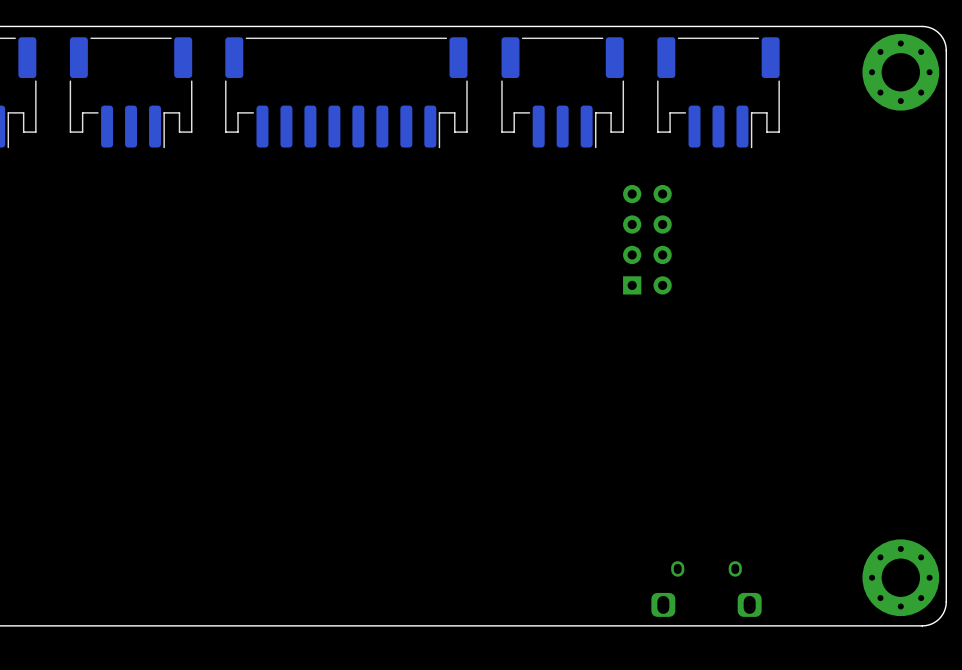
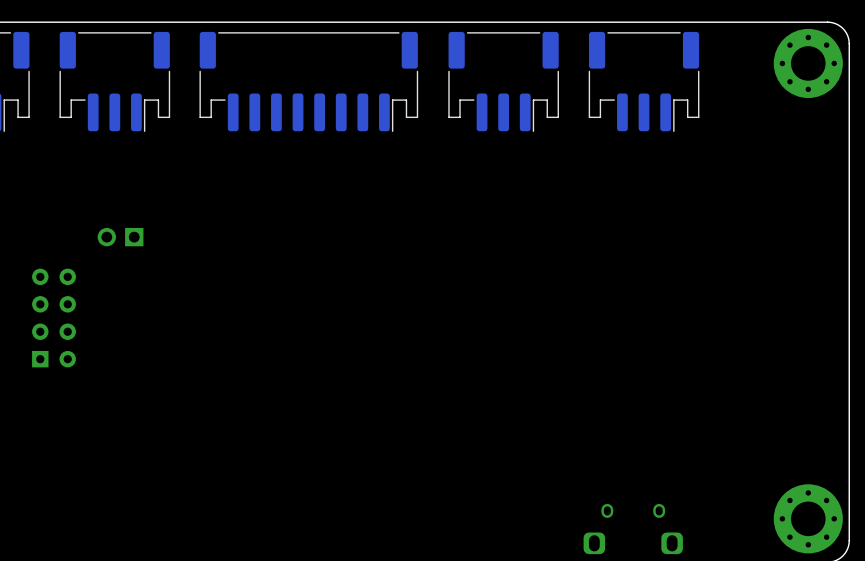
part: (647, 239) -> none
part: none -> (120, 237)
part: none -> (54, 318)

